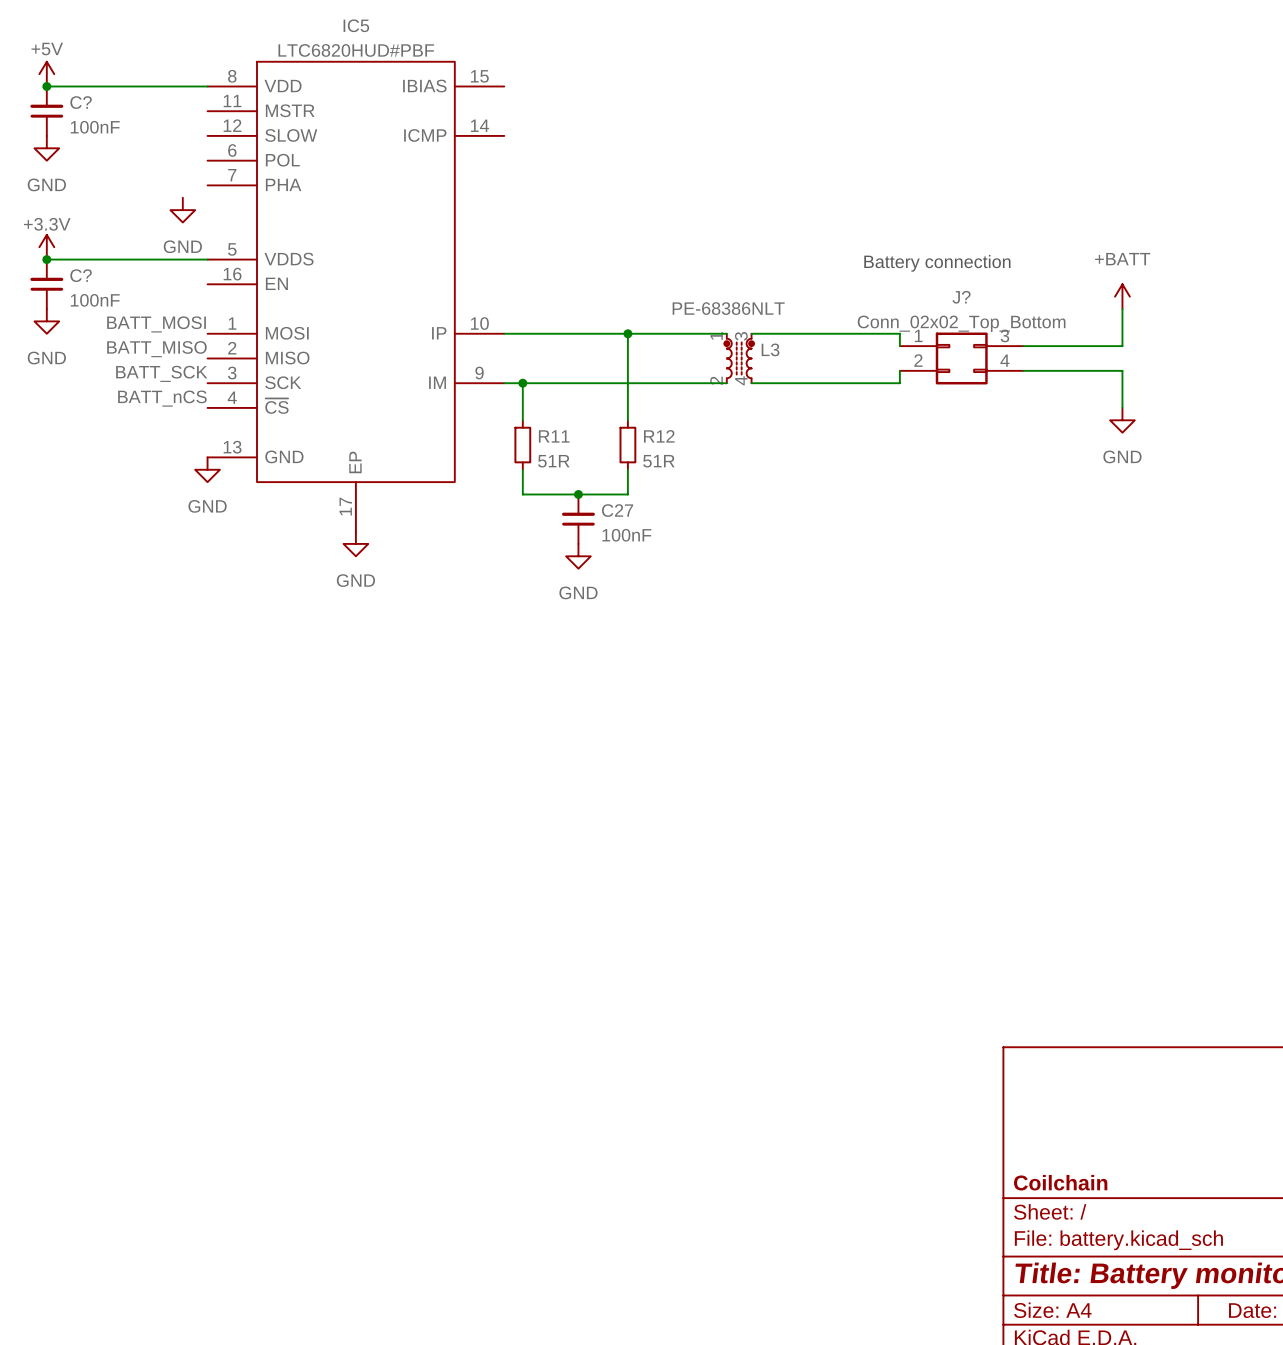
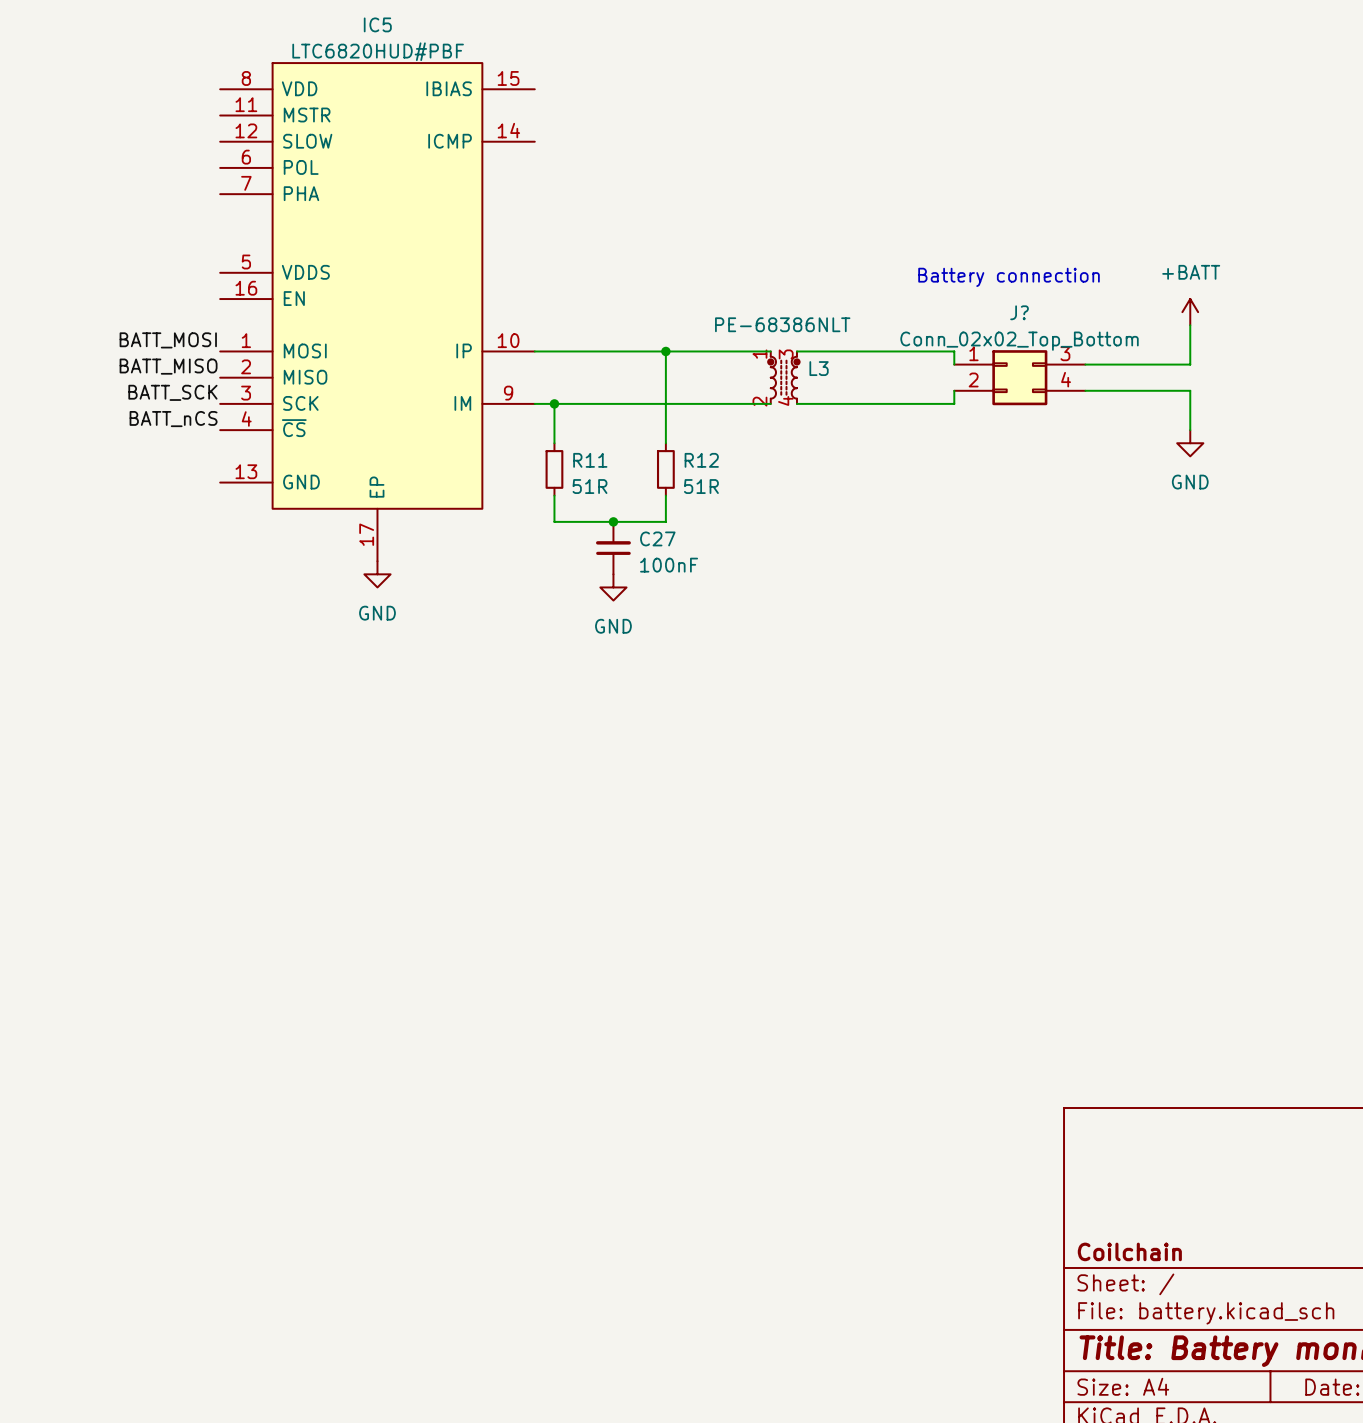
power symbol: +5V (46, 74) -> none
wire: (46, 86) (207, 86) -> none
junction: (46, 86) -> none
C?: 100nF (46, 111) -> none
power symbol: GND (46, 148) -> none
power symbol: GND (182, 210) -> none
power symbol: +3.3V (46, 247) -> none
wire: (46, 259) (207, 259) -> none
junction: (46, 259) -> none
C?: 100nF (46, 284) -> none
power symbol: GND (46, 321) -> none
power symbol: GND (207, 469) -> none

